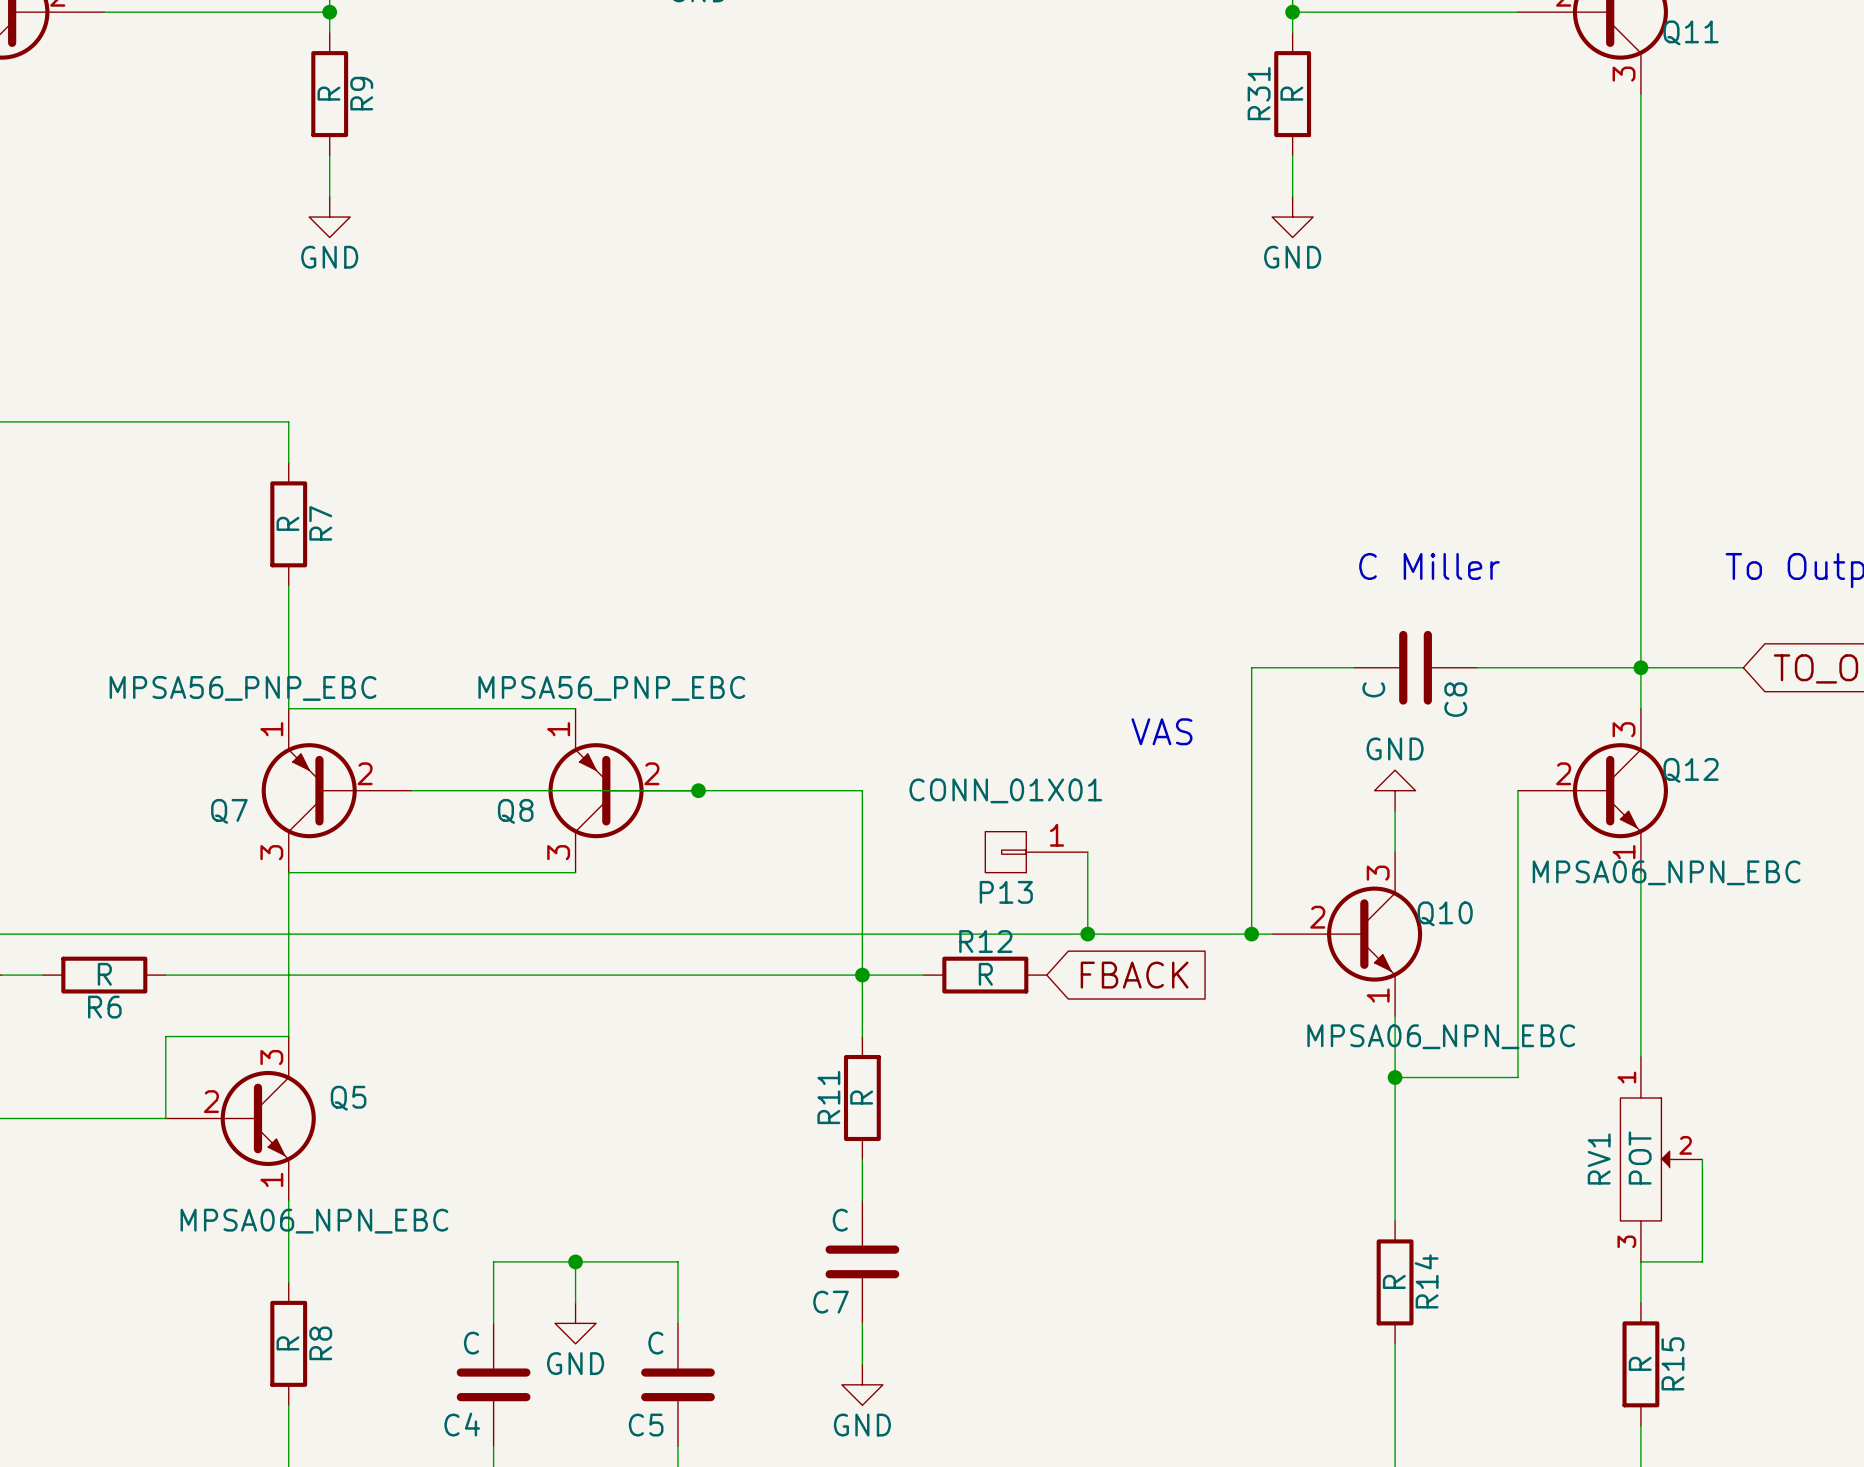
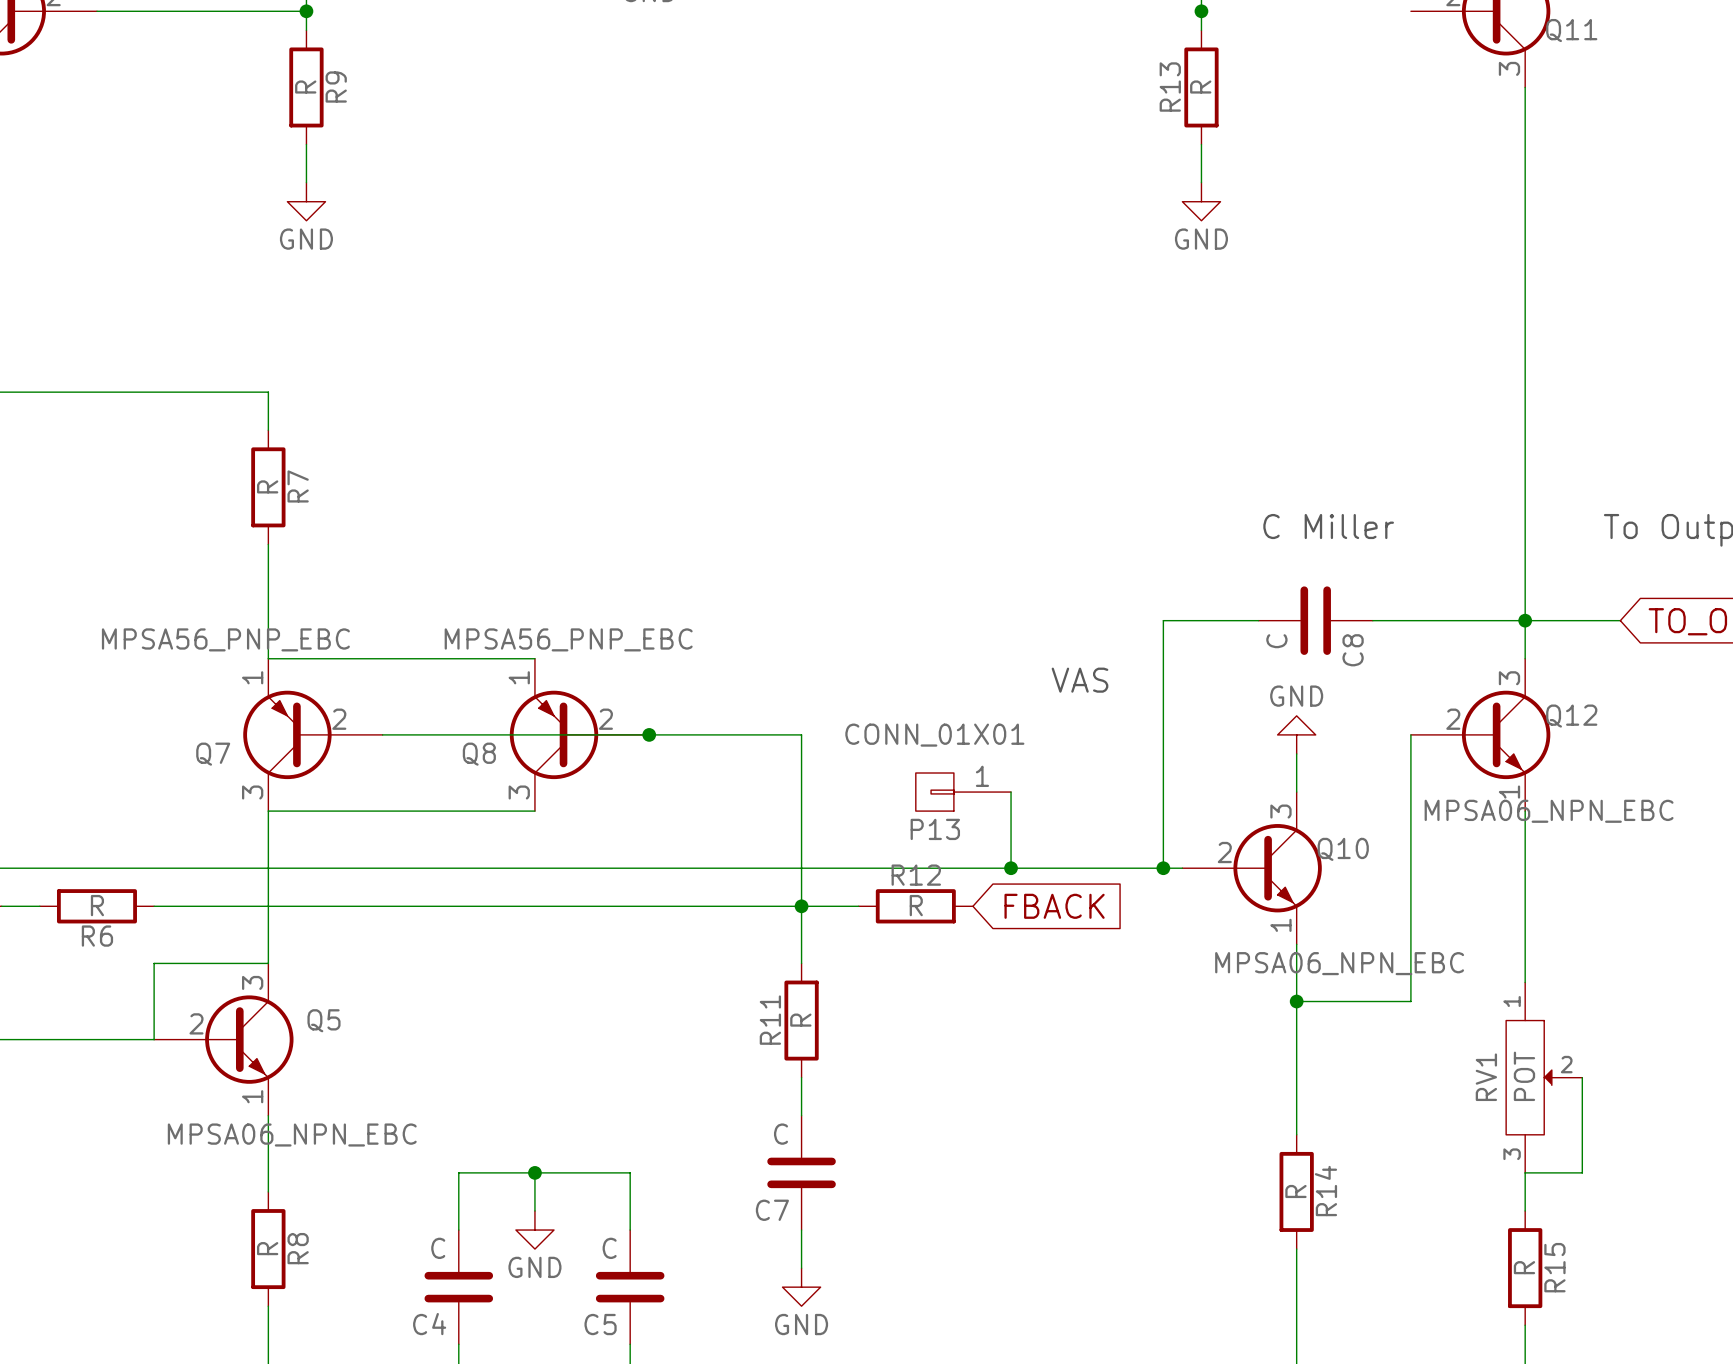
wire: (1292, 12) (1518, 12) -> none
R31 name: R31 (1259, 93) -> R13 (1170, 87)

